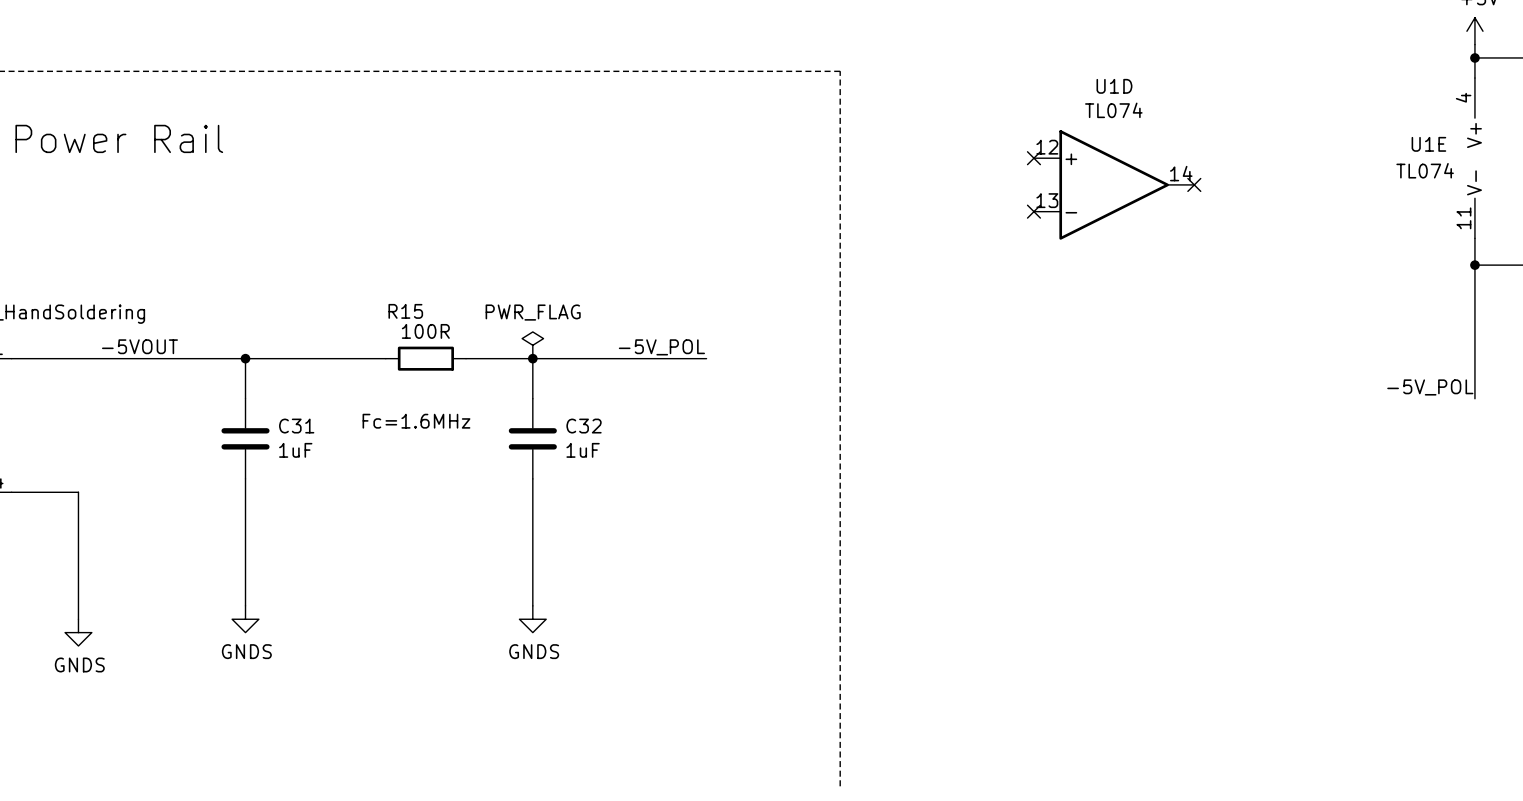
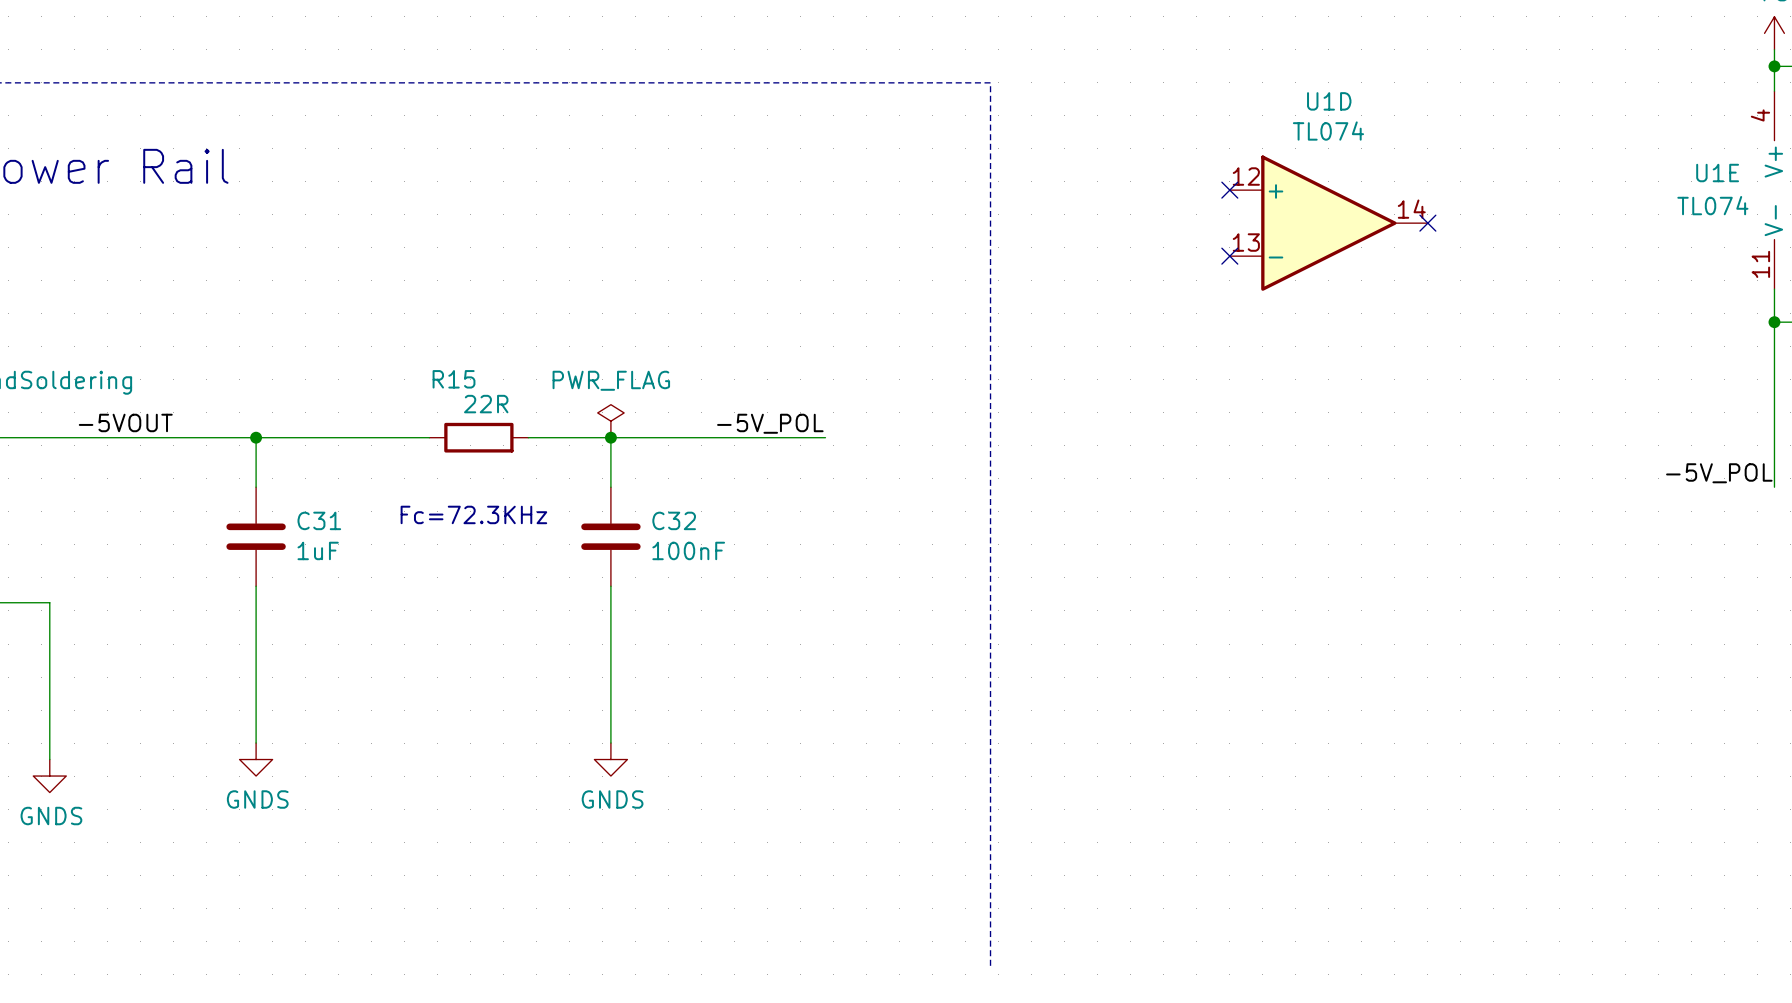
R15 value: 100R (425, 331) -> 22R (486, 404)
text: Fc=1.6MHz (416, 421) -> Fc=72.3KHz (473, 514)
C32 value: 1uF (583, 450) -> 100nF (688, 550)

